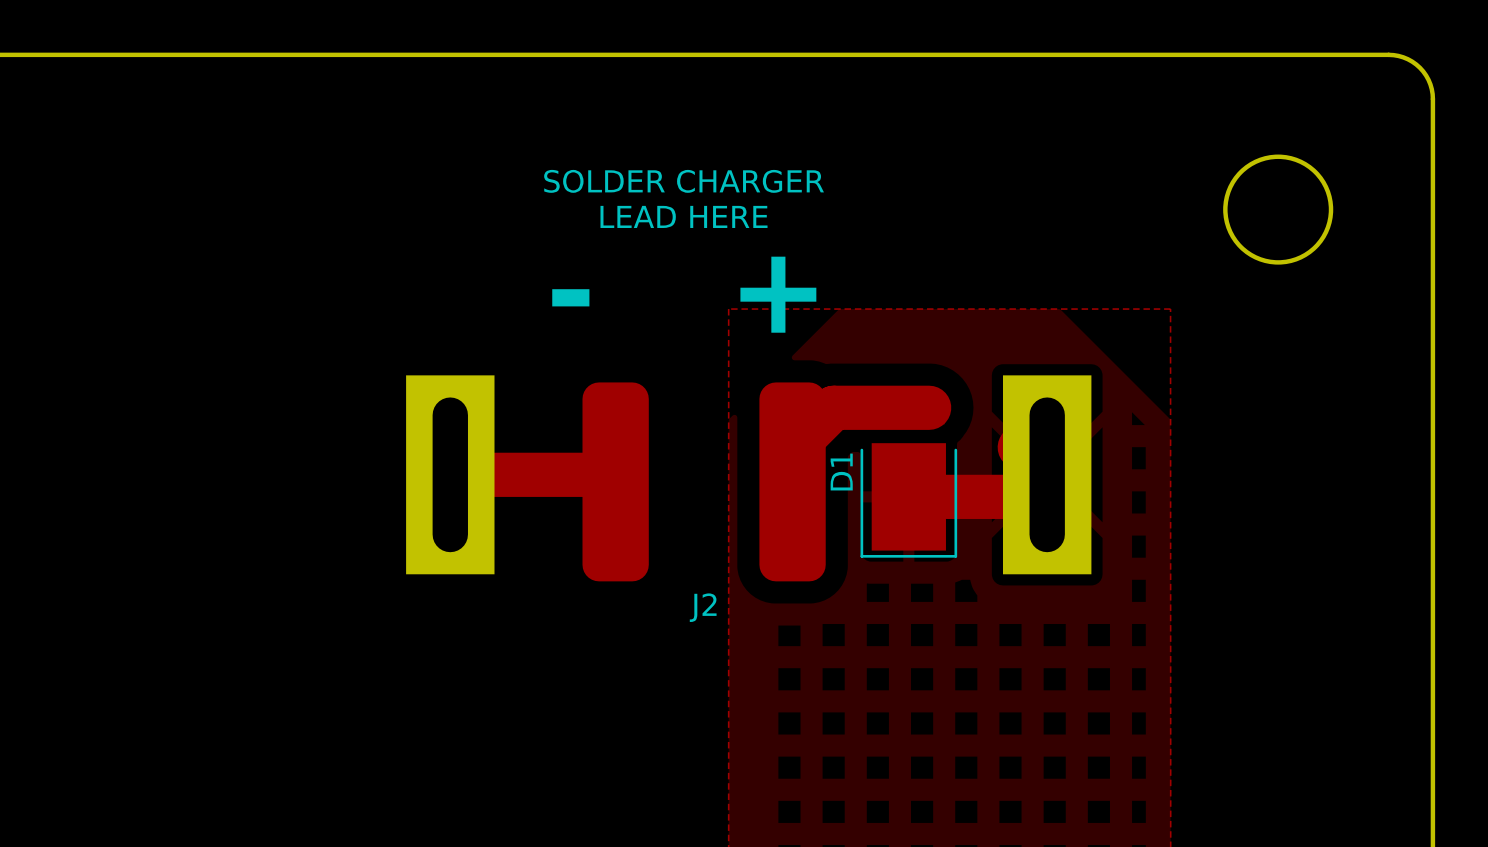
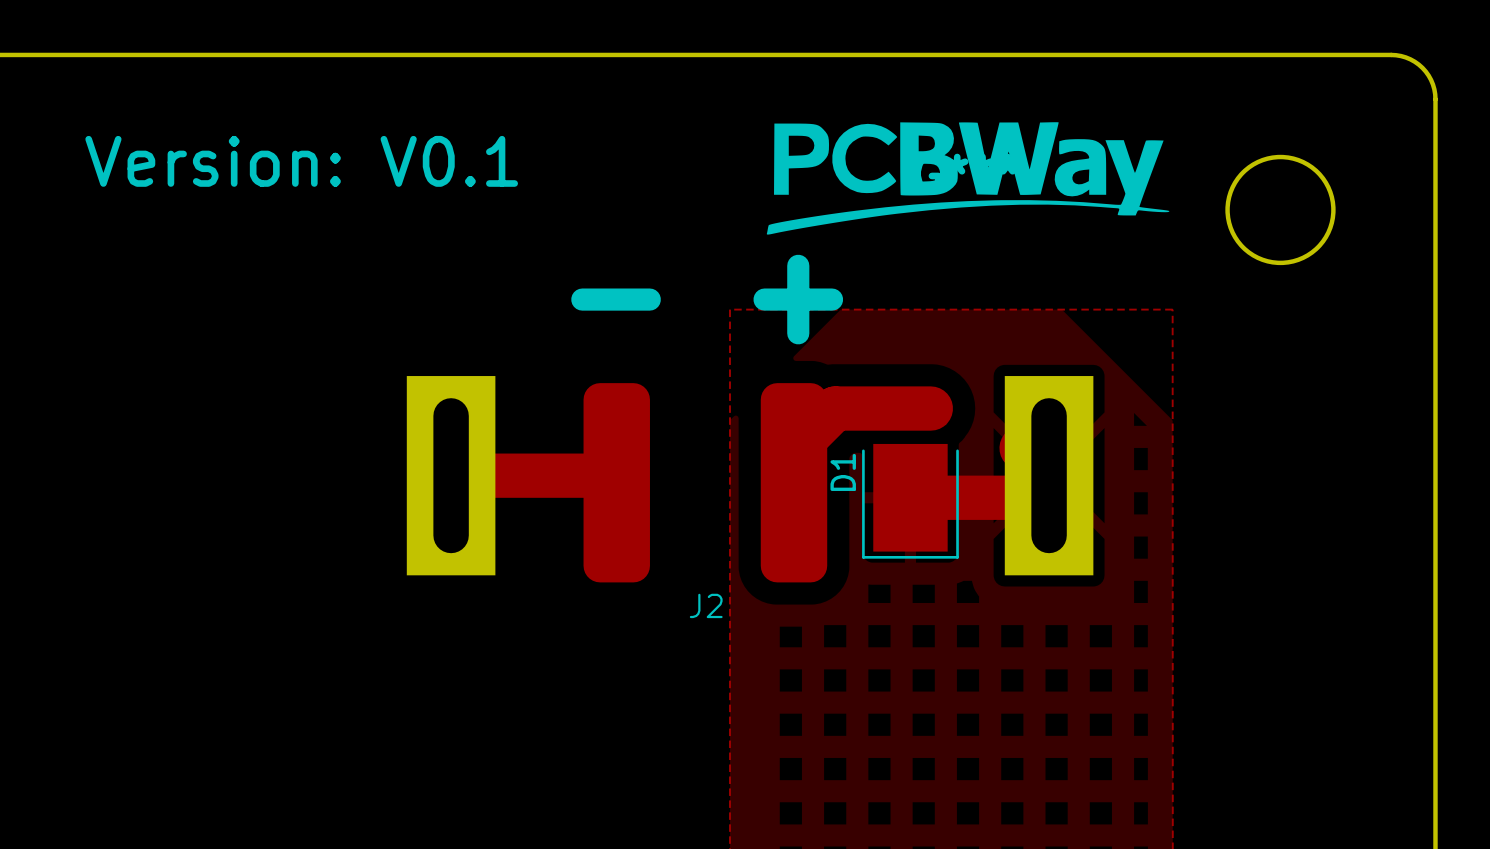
text: none -> Version: V0.1 (301, 161)
part: none -> (968, 178)
text: SOLDER CHARGER (684, 181) -> none
text: LEAD HERE (684, 216) -> none

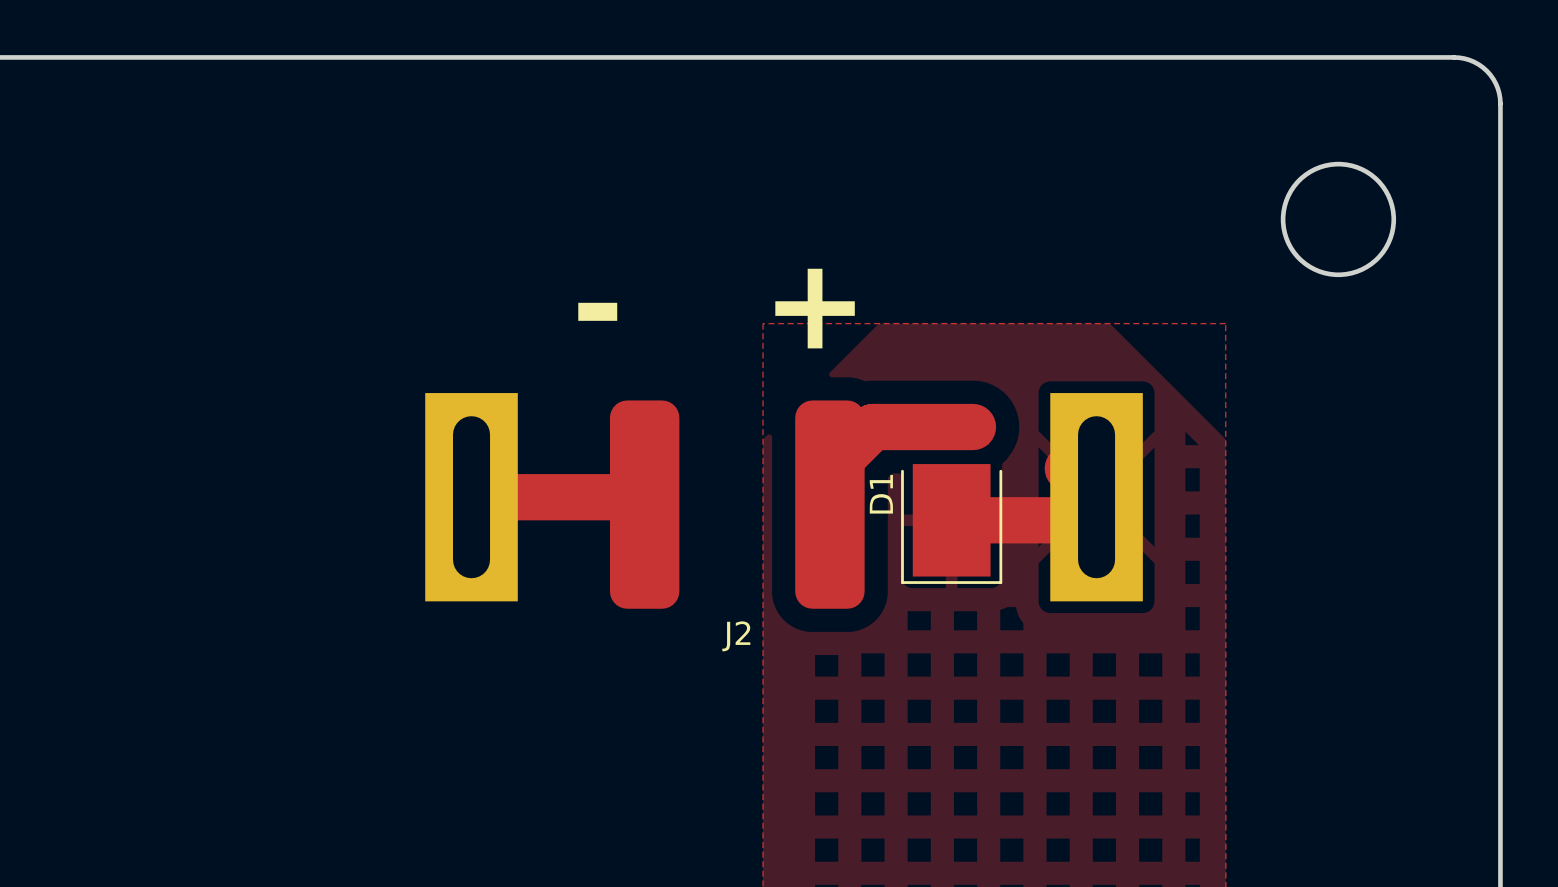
text: Version: V0.1 (301, 161) -> none
part: (968, 178) -> none

